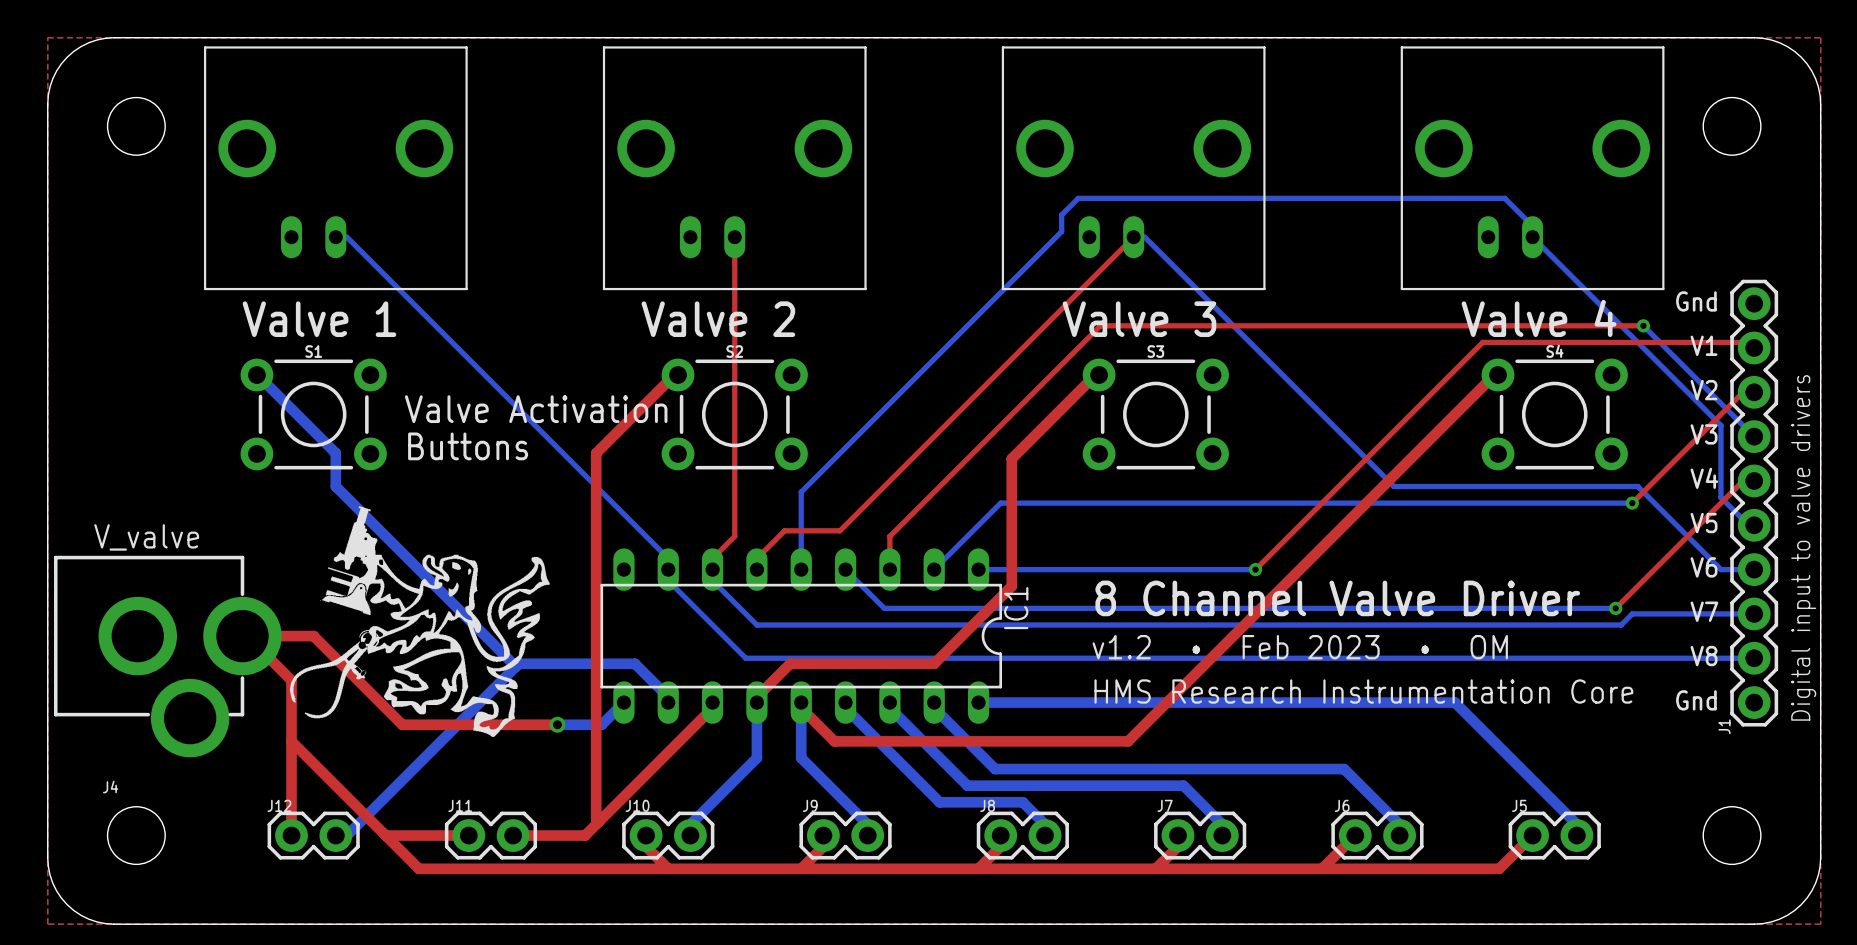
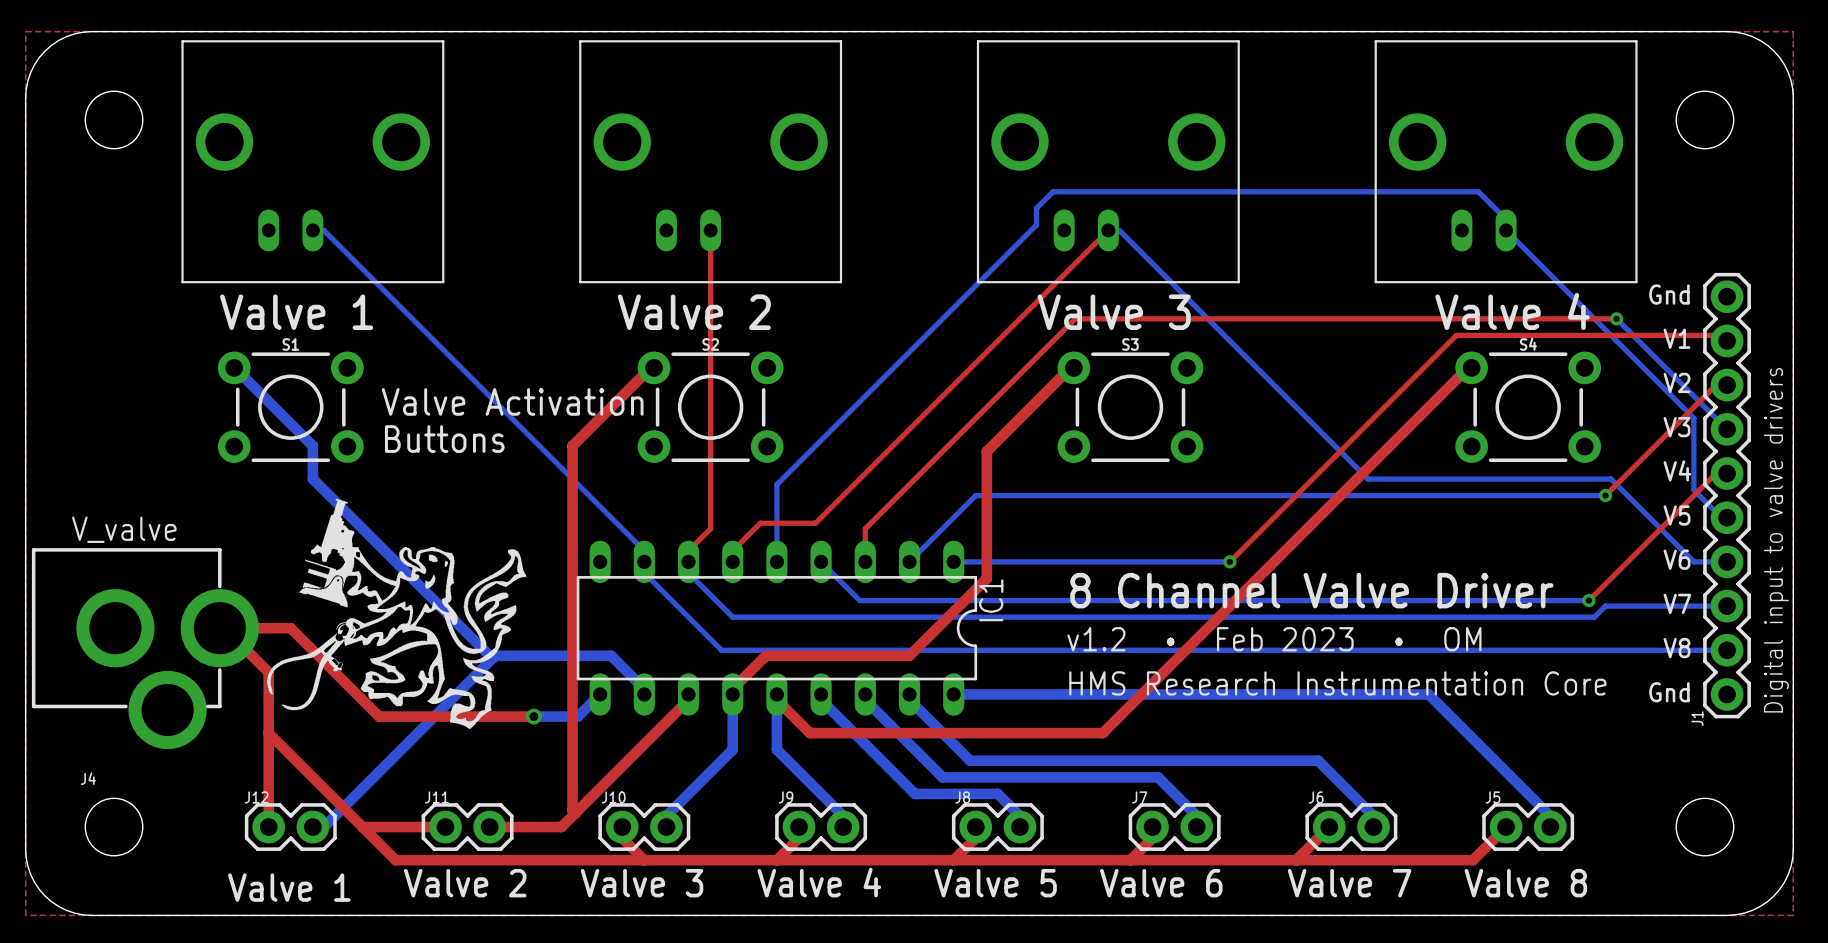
J11 value: none -> Valve 2 (465, 883)
J10 value: none -> Valve 3 (642, 883)
J9 value: none -> Valve 4 (819, 882)
J8 value: none -> Valve 5 (995, 883)
J7 value: none -> Valve 6 (1161, 883)
J6 value: none -> Valve 7 (1349, 883)
J5 value: none -> Valve 8 (1525, 883)
J12 value: none -> Valve 1 (289, 887)

